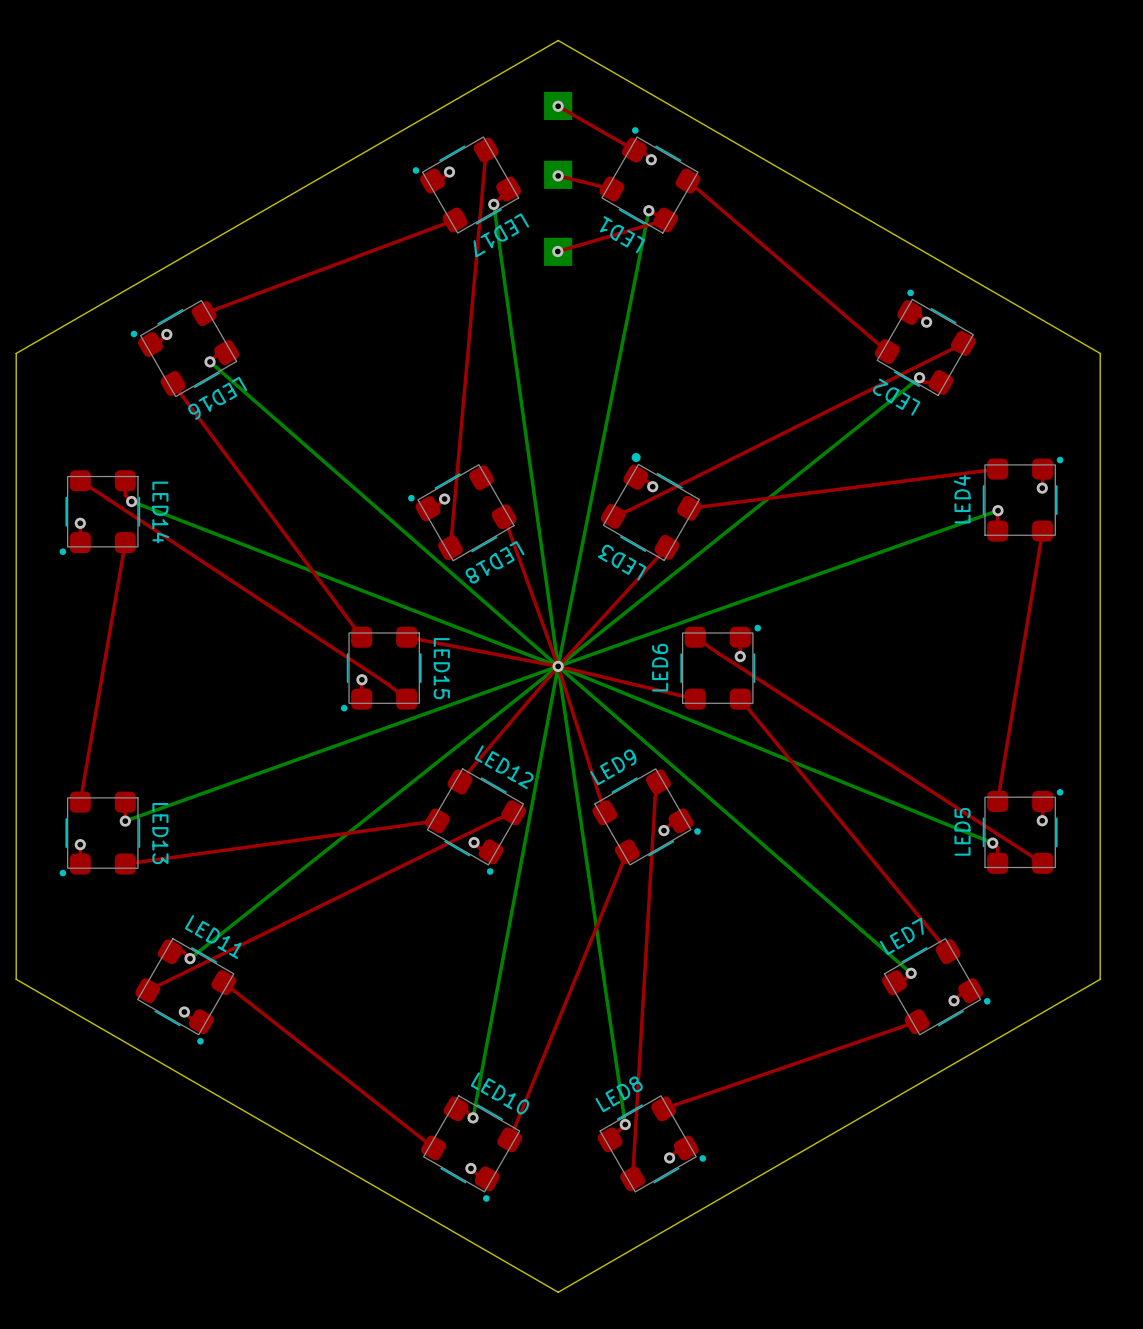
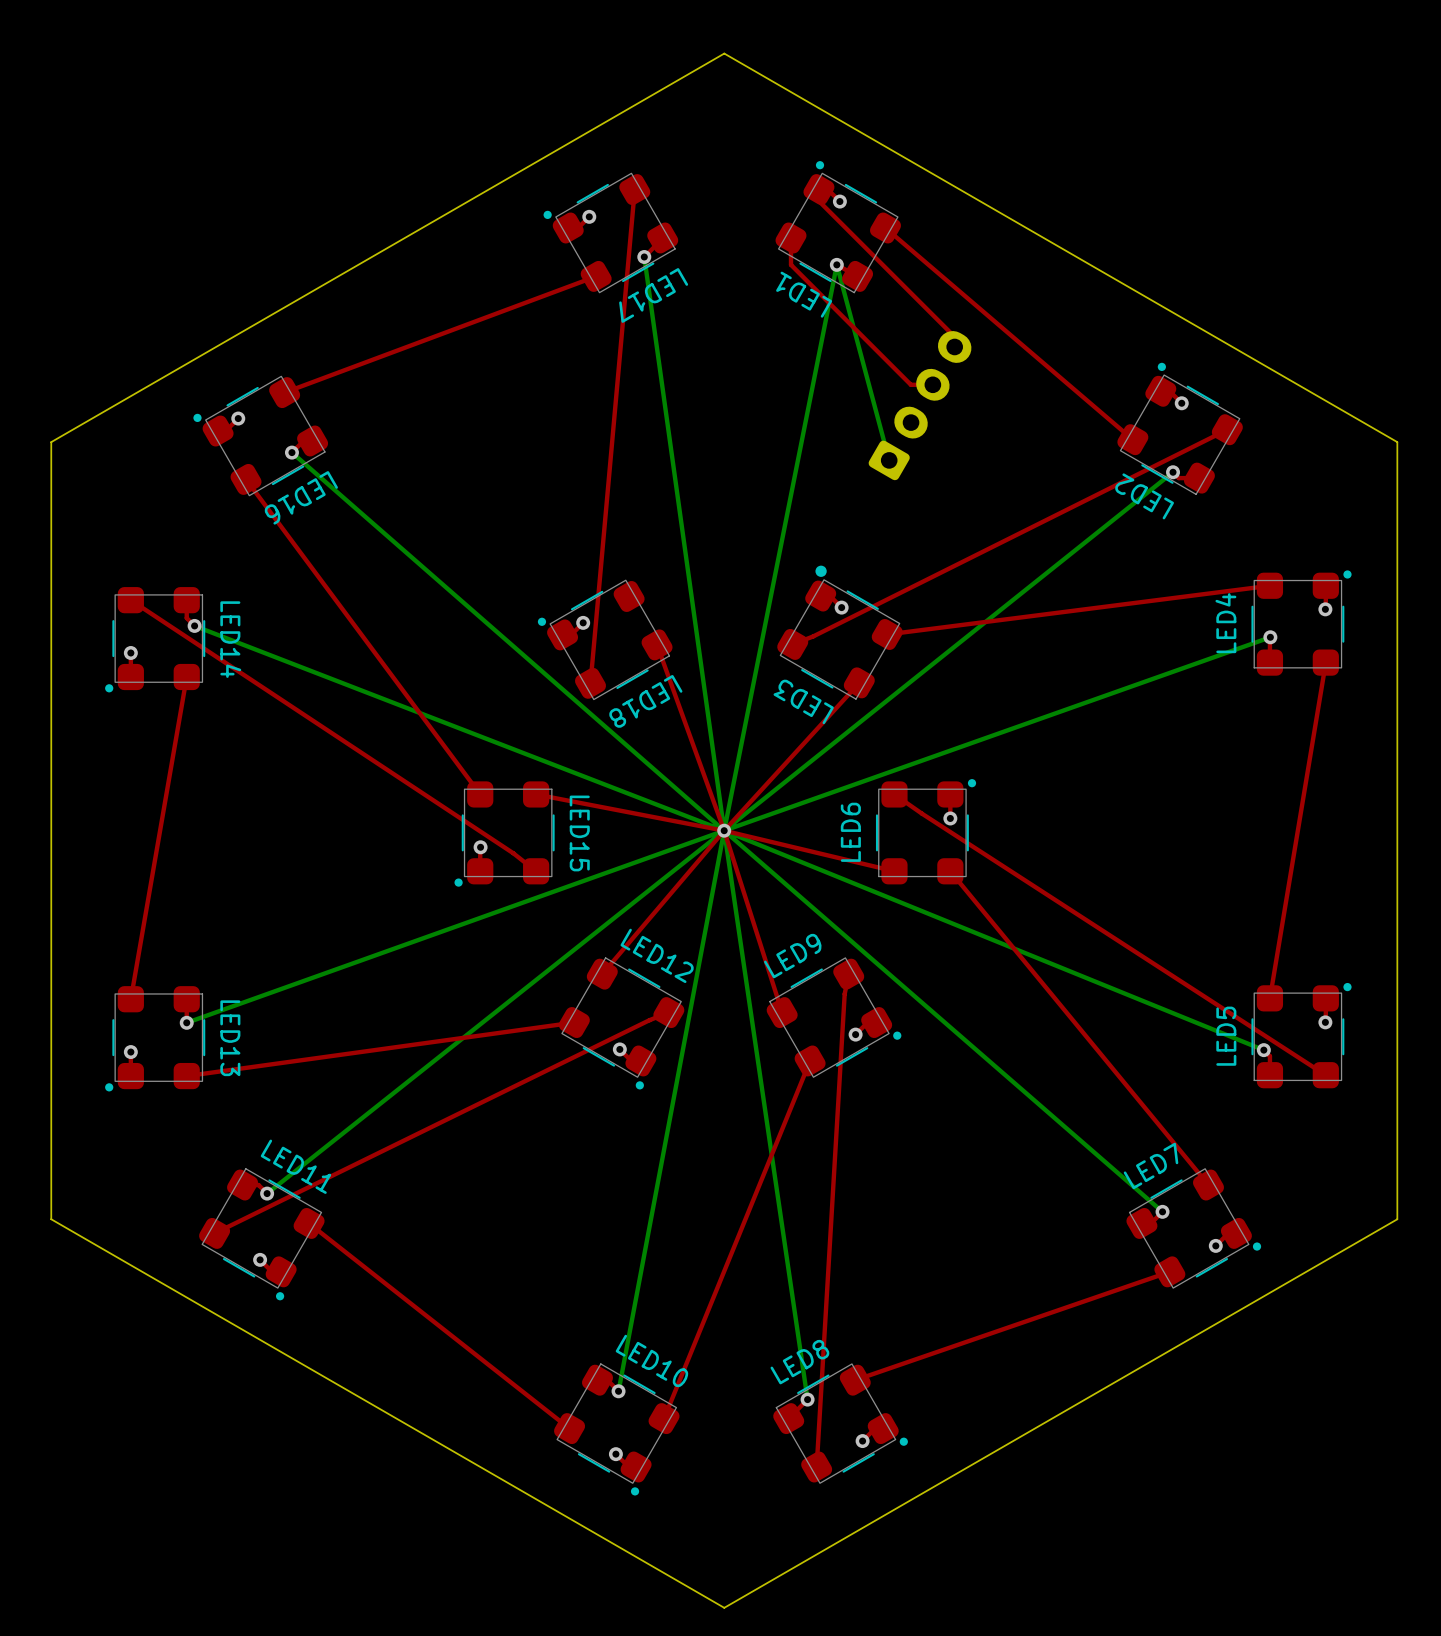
part: (558, 105) -> none
top track: (558, 106) (634, 150) -> (954, 346) (954, 336) (818, 201) (818, 189)
via: (558, 106) -> none
part: (558, 174) -> none
top track: (558, 175) (611, 189) -> (932, 384) (910, 384) (791, 264) (791, 237)
via: (558, 175) -> none
bottom track: none -> (836, 264) (889, 460)
top track: (665, 220) (557, 251) -> none
via: (557, 251) -> none
part: (558, 251) -> none
part: none -> (920, 405)

